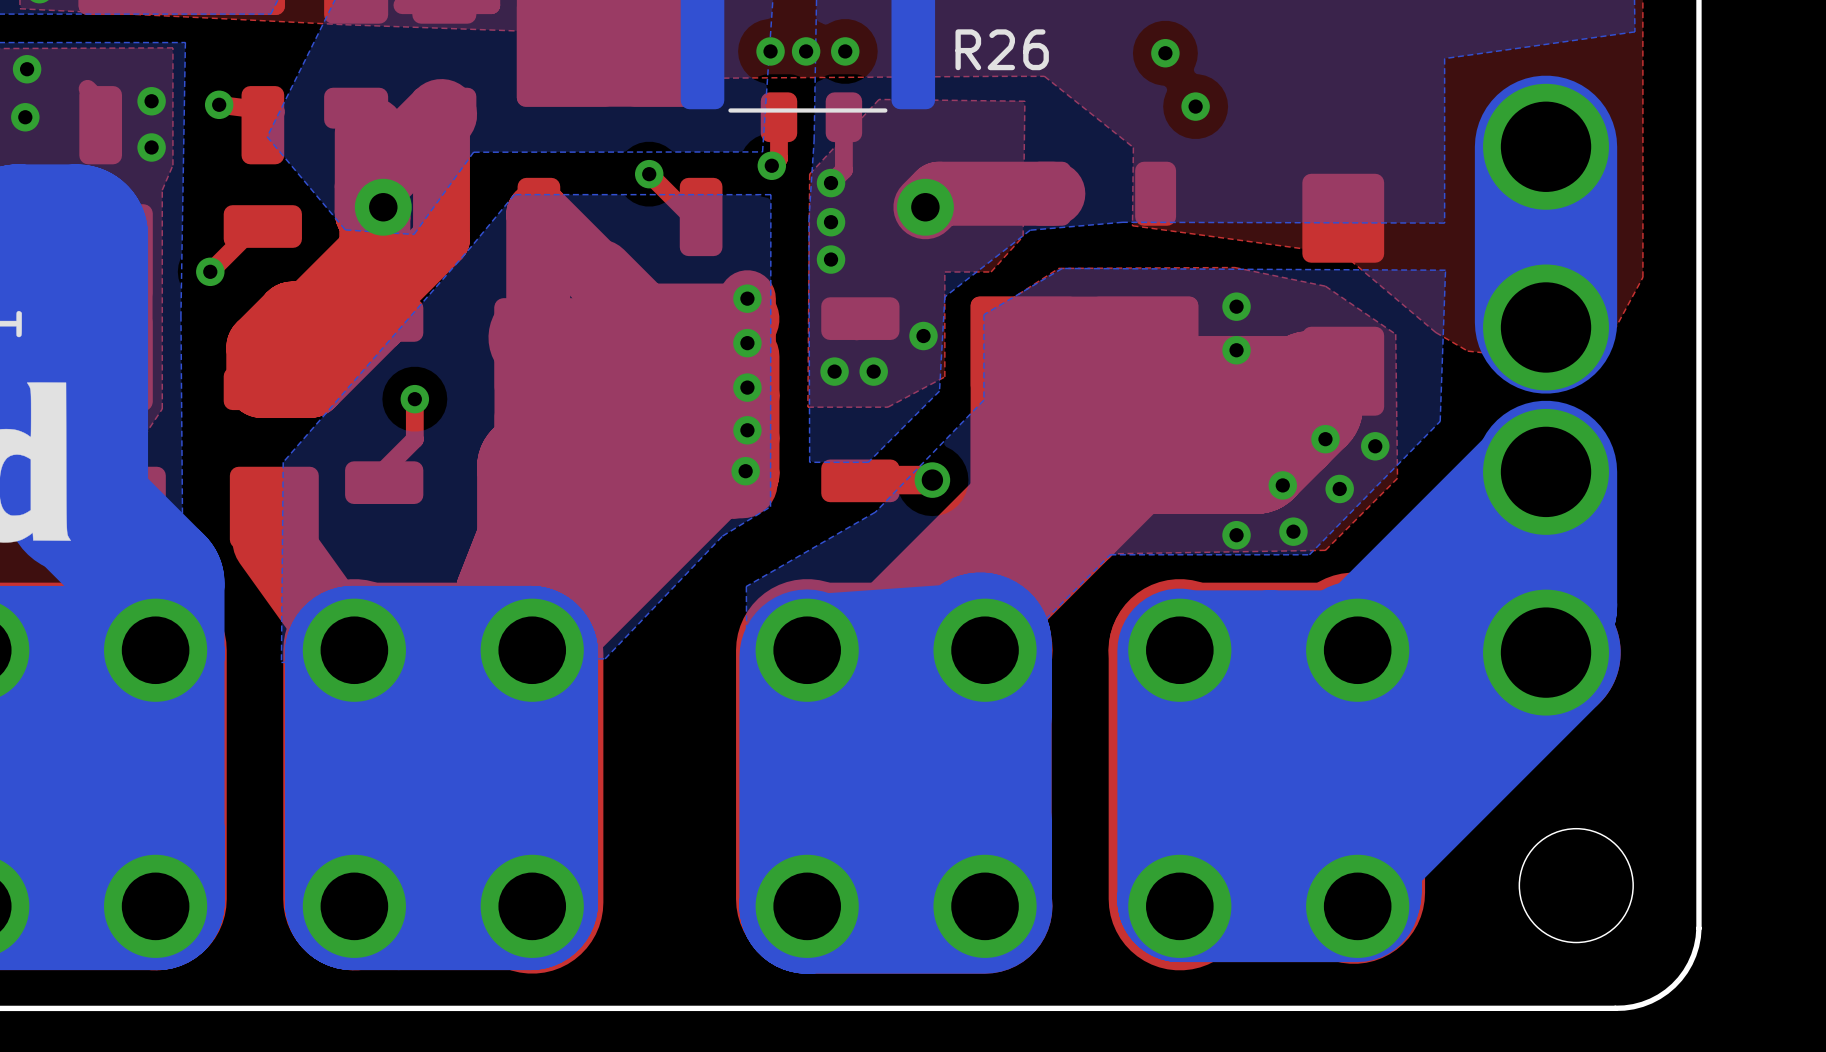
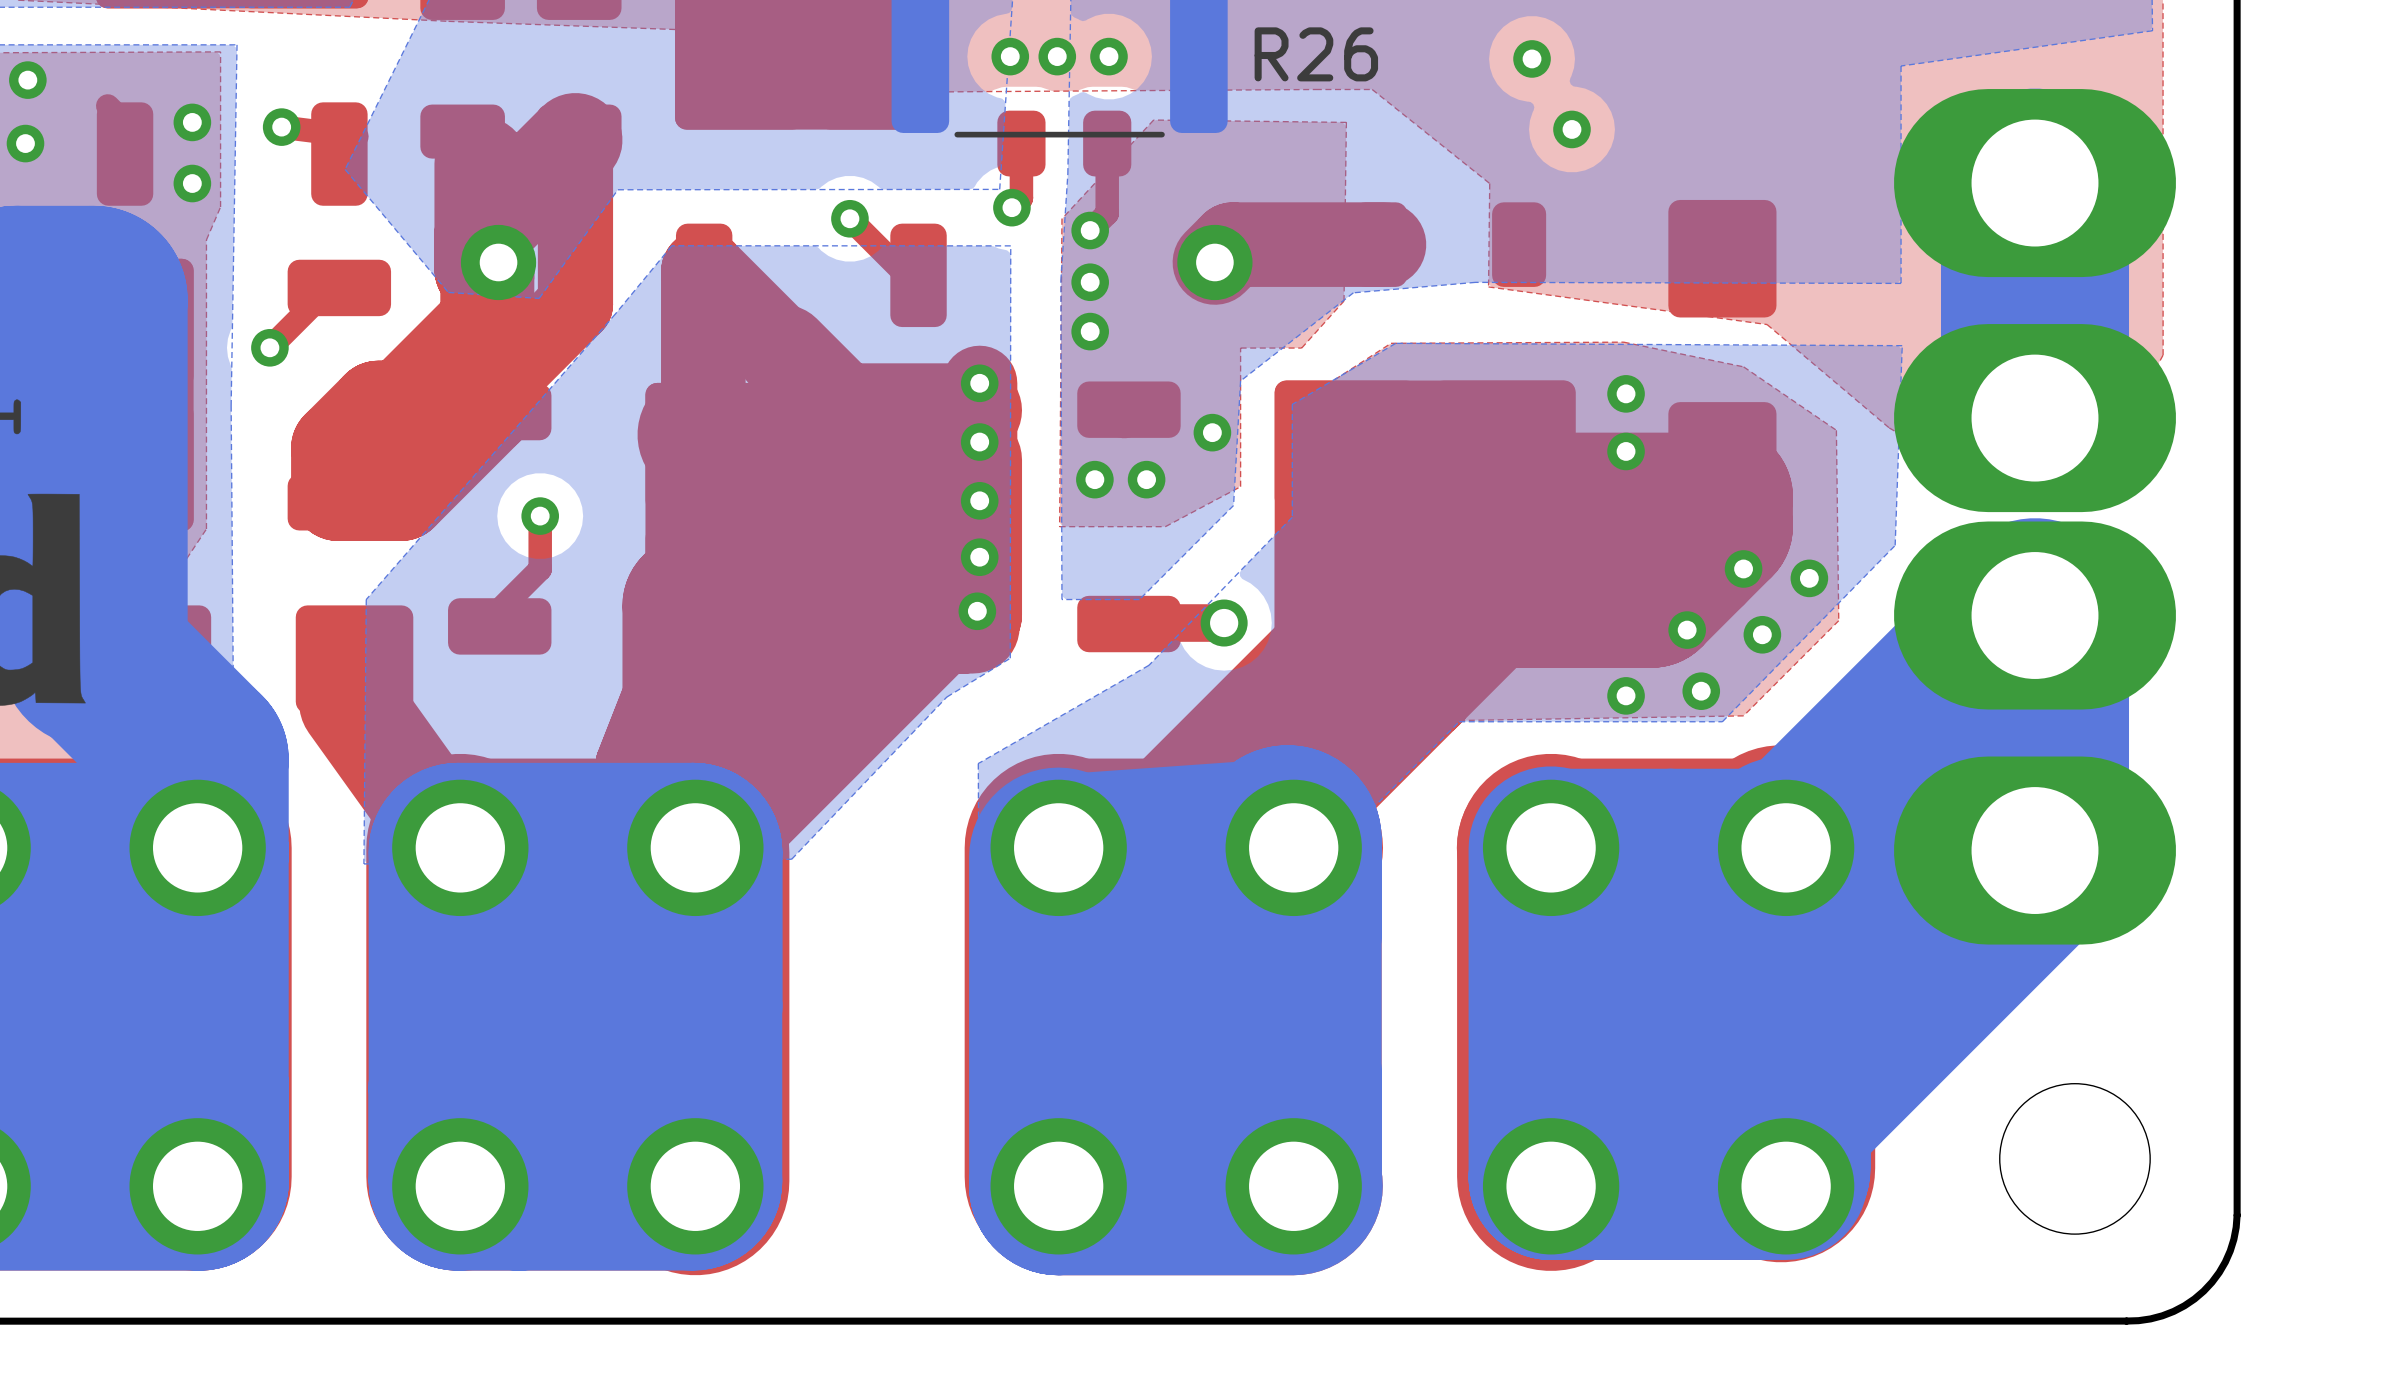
part footprint: [1483, 83, 1609, 716] -> [1893, 89, 2177, 945]
part position: (1343, 294) -> (1722, 359)

